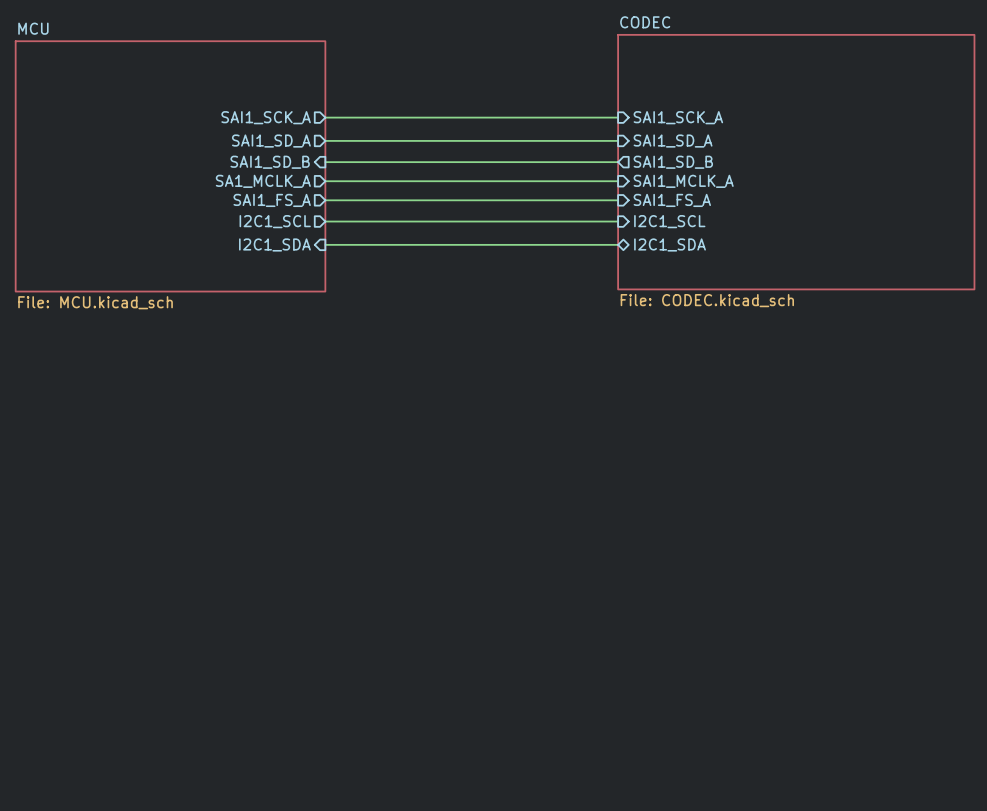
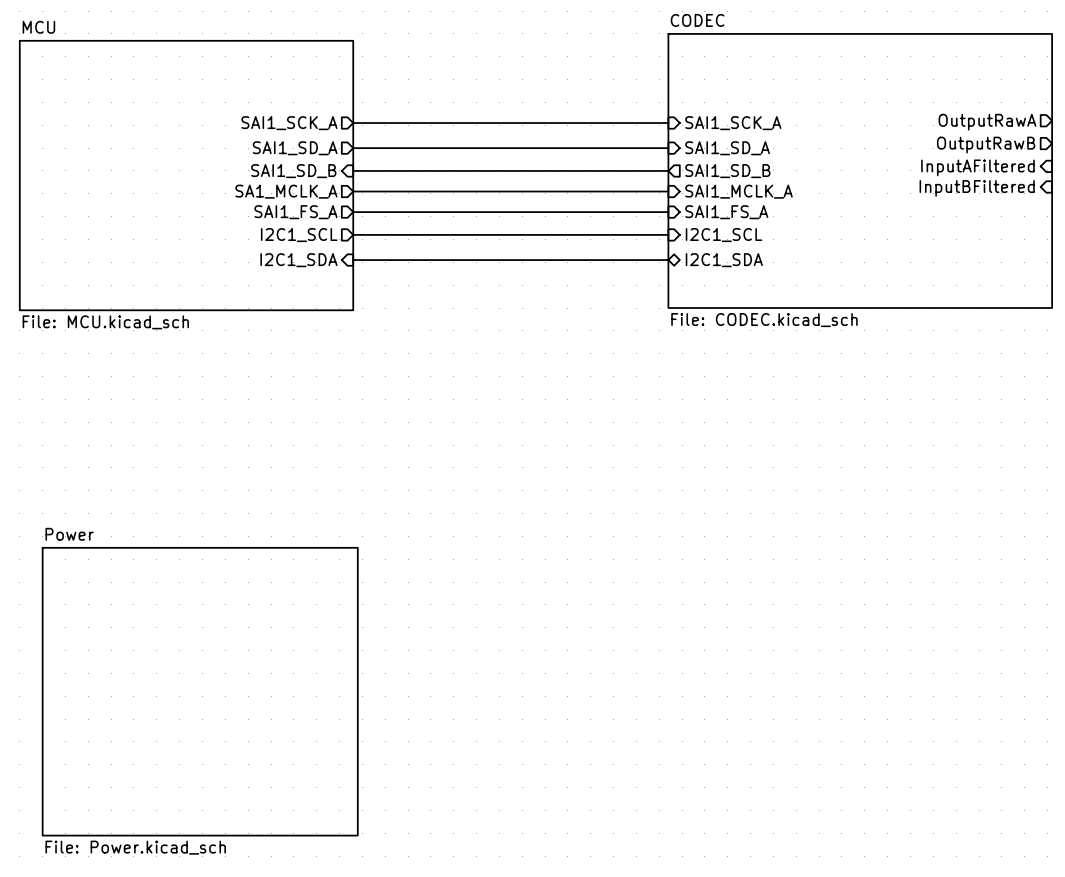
sheet pin: none -> OutputRawA (987, 122)
sheet pin: none -> OutputRawB (986, 145)
sheet pin: none -> InputAFiltered (977, 167)
sheet pin: none -> InputBFiltered (977, 188)
sheet Power: none -> File: Power.kicad_sch (200, 691)

